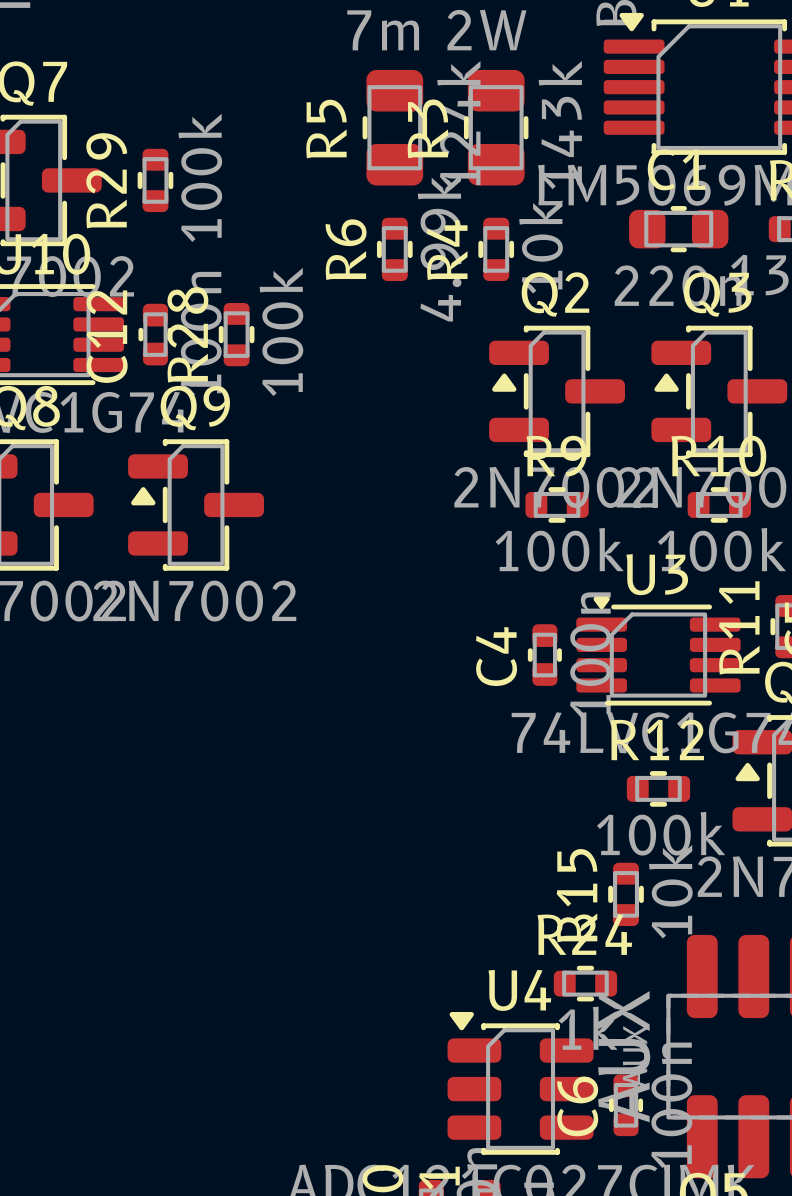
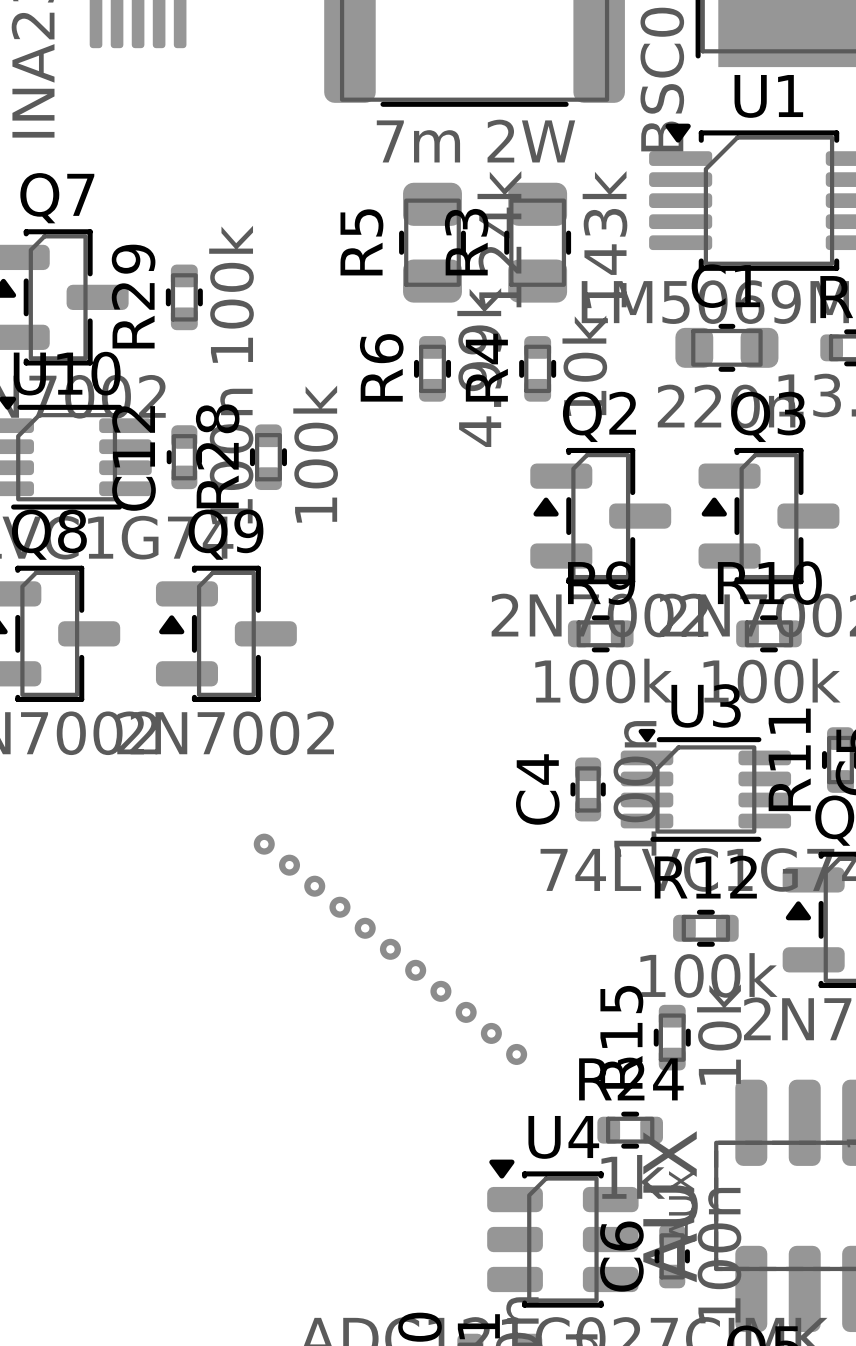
part: none -> (264, 844)
part: none -> (289, 865)
part: none -> (314, 886)
part: none -> (339, 907)
part: none -> (365, 928)
part: none -> (390, 949)
part: none -> (415, 970)
part: none -> (440, 991)
part: none -> (466, 1012)
part: none -> (491, 1033)
part: none -> (516, 1054)

